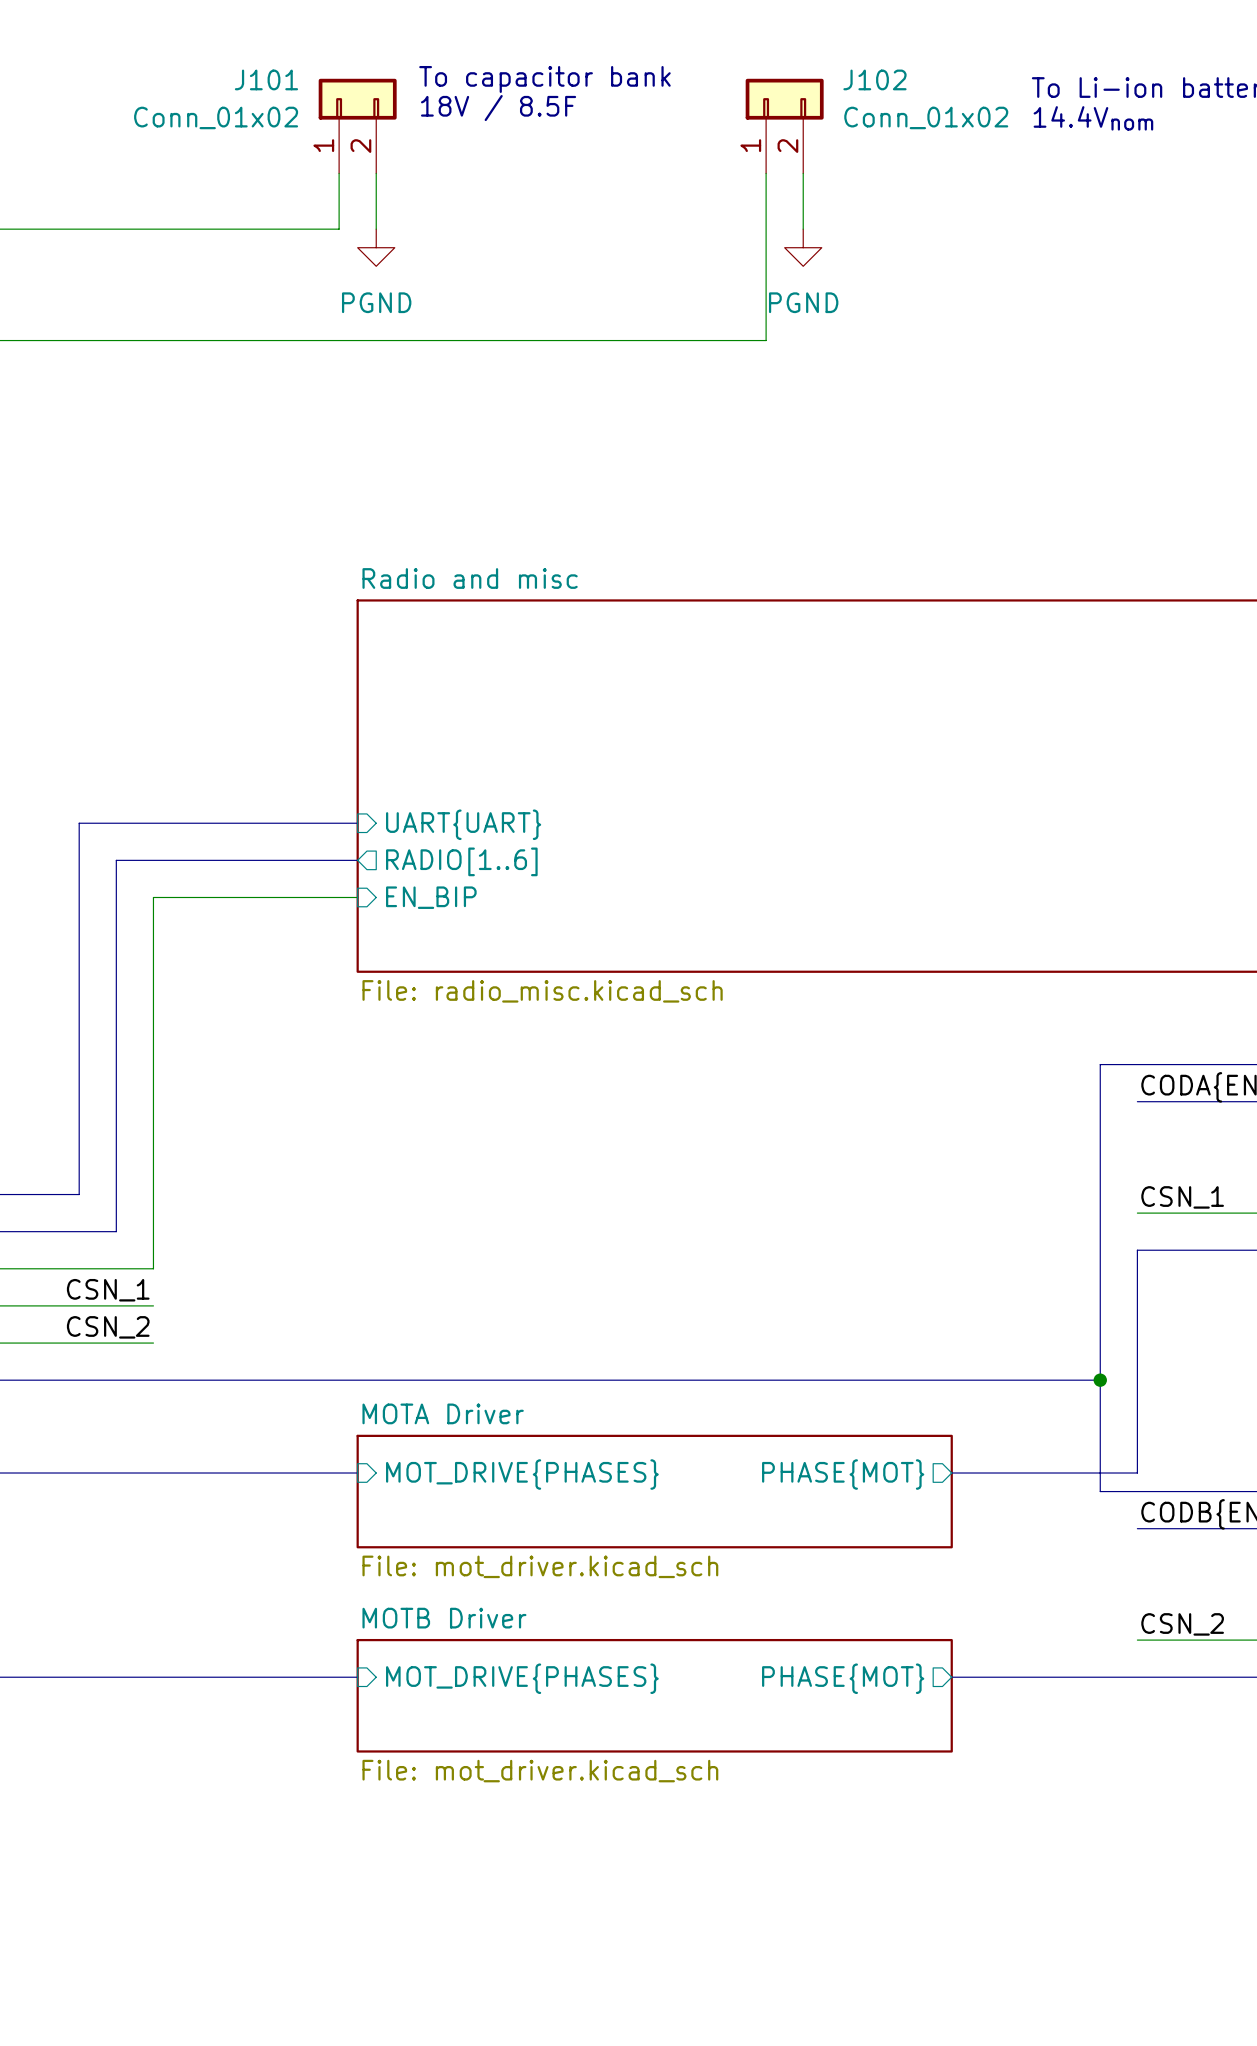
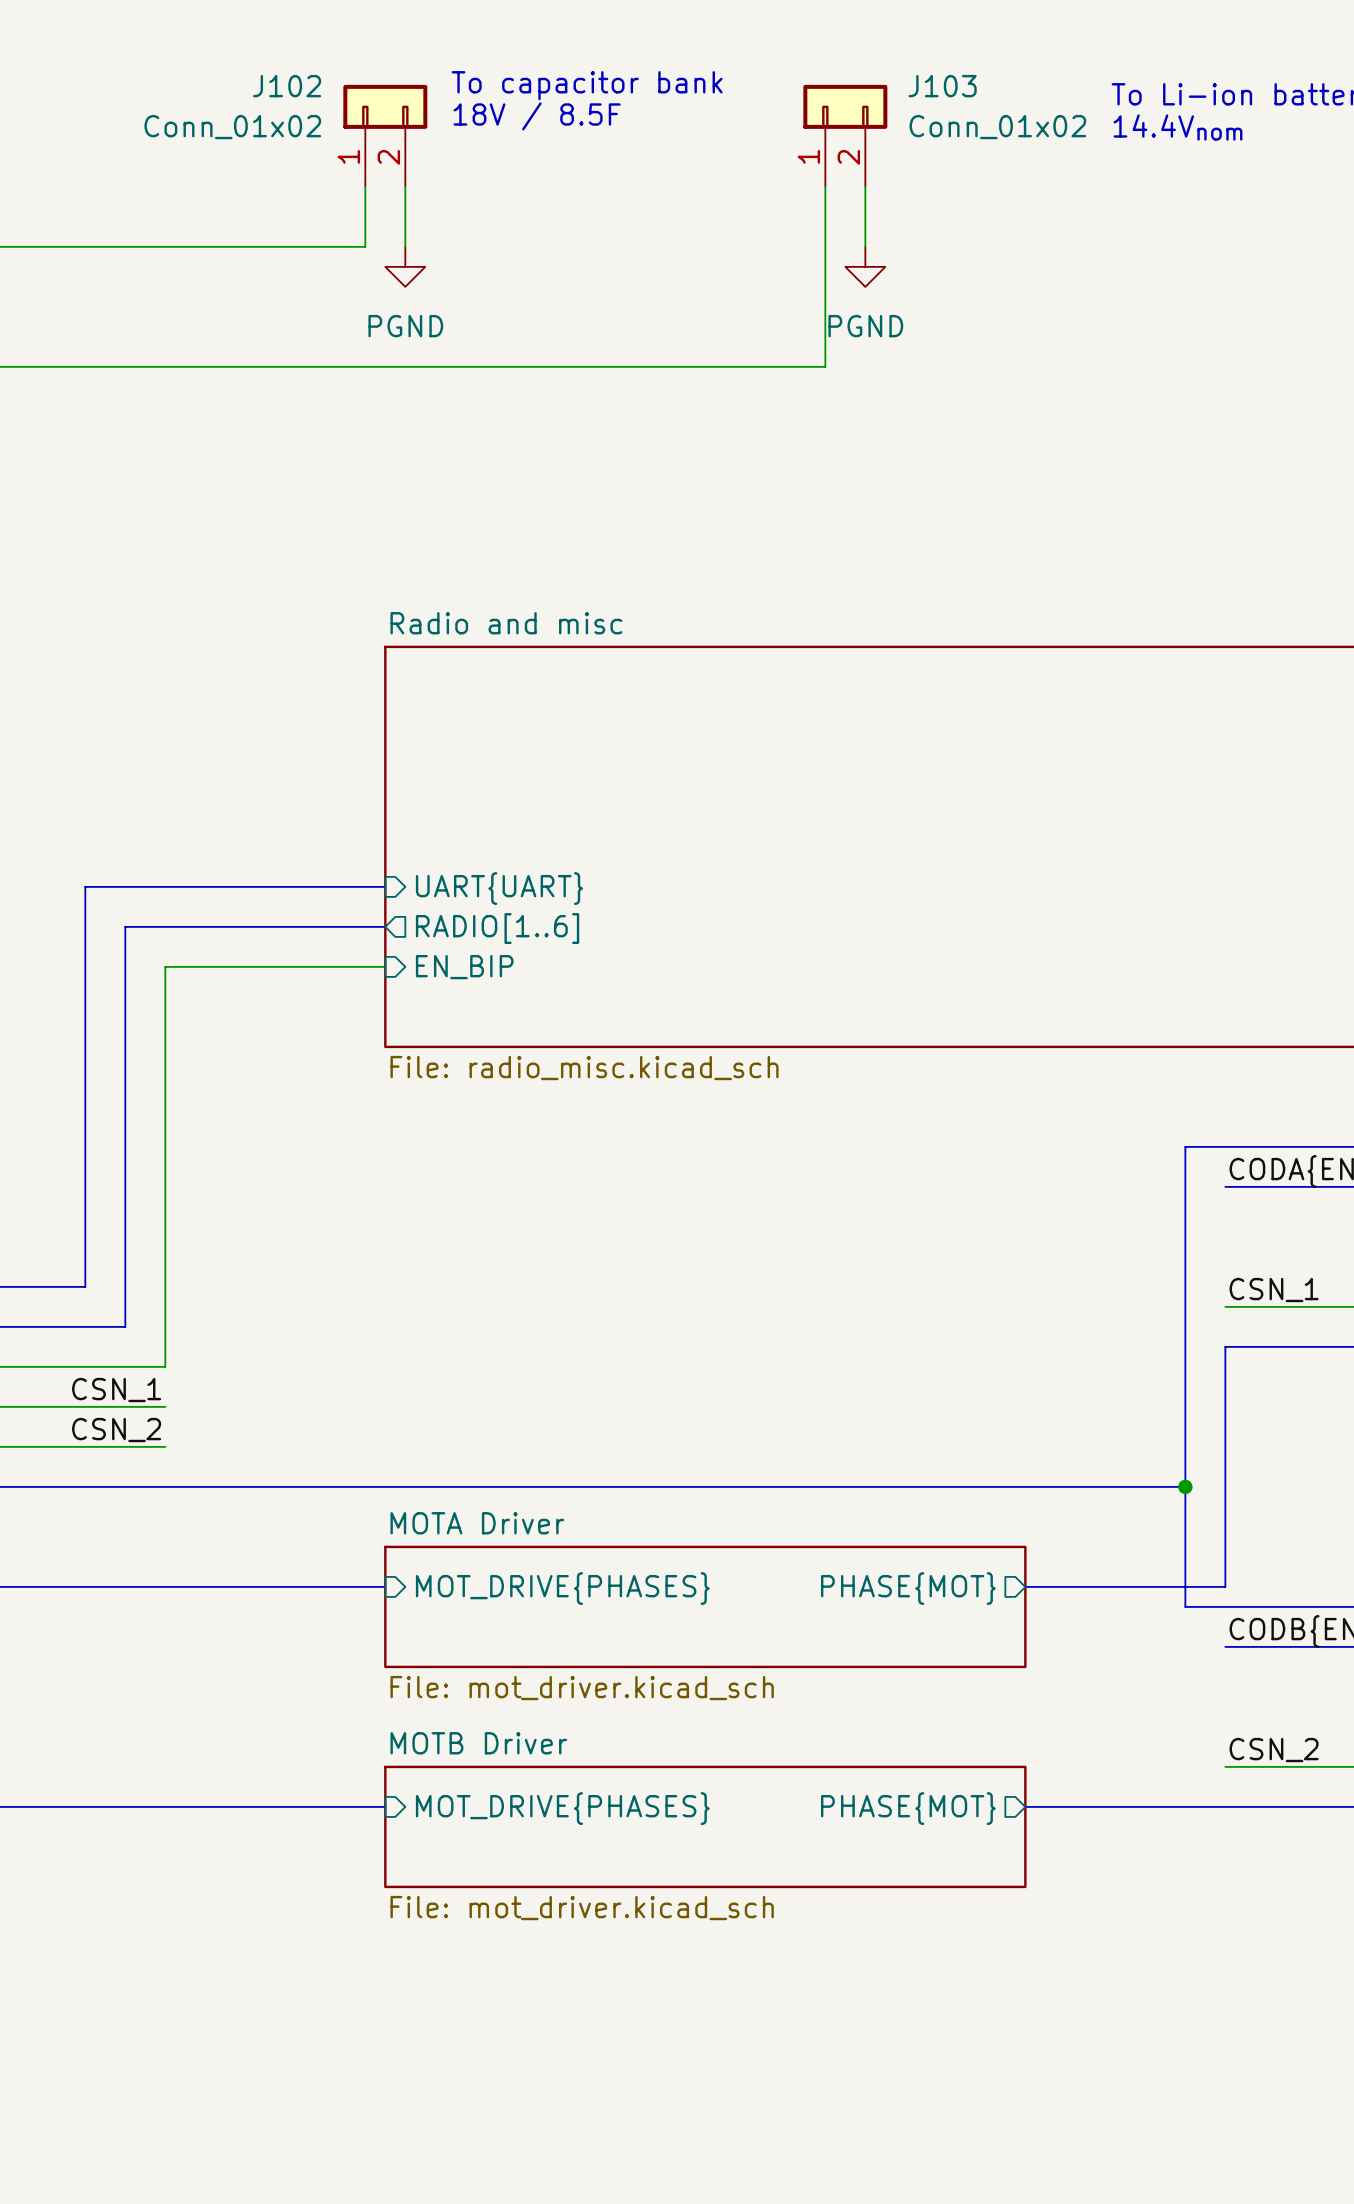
J101 name: J101 (266, 79) -> J102 (287, 86)
J102 name: J102 (874, 79) -> J103 (942, 86)

